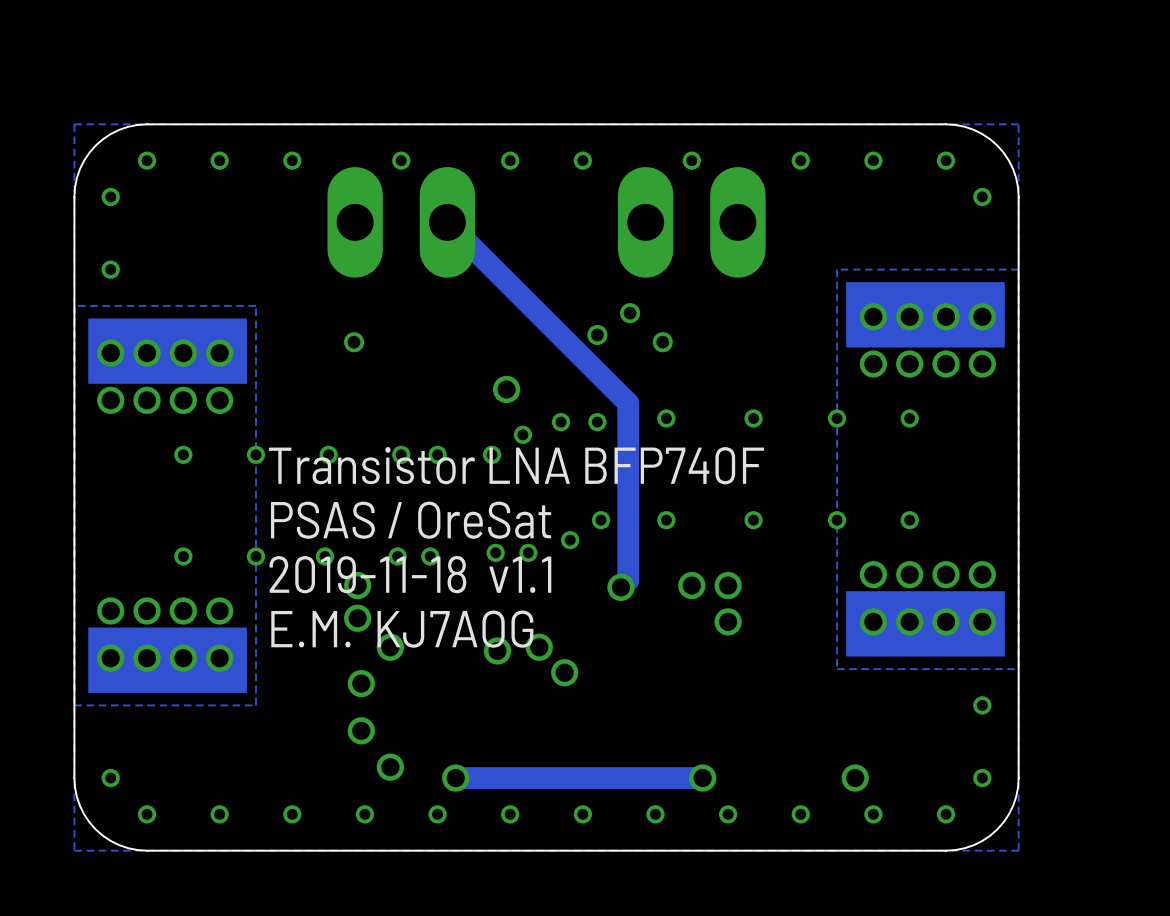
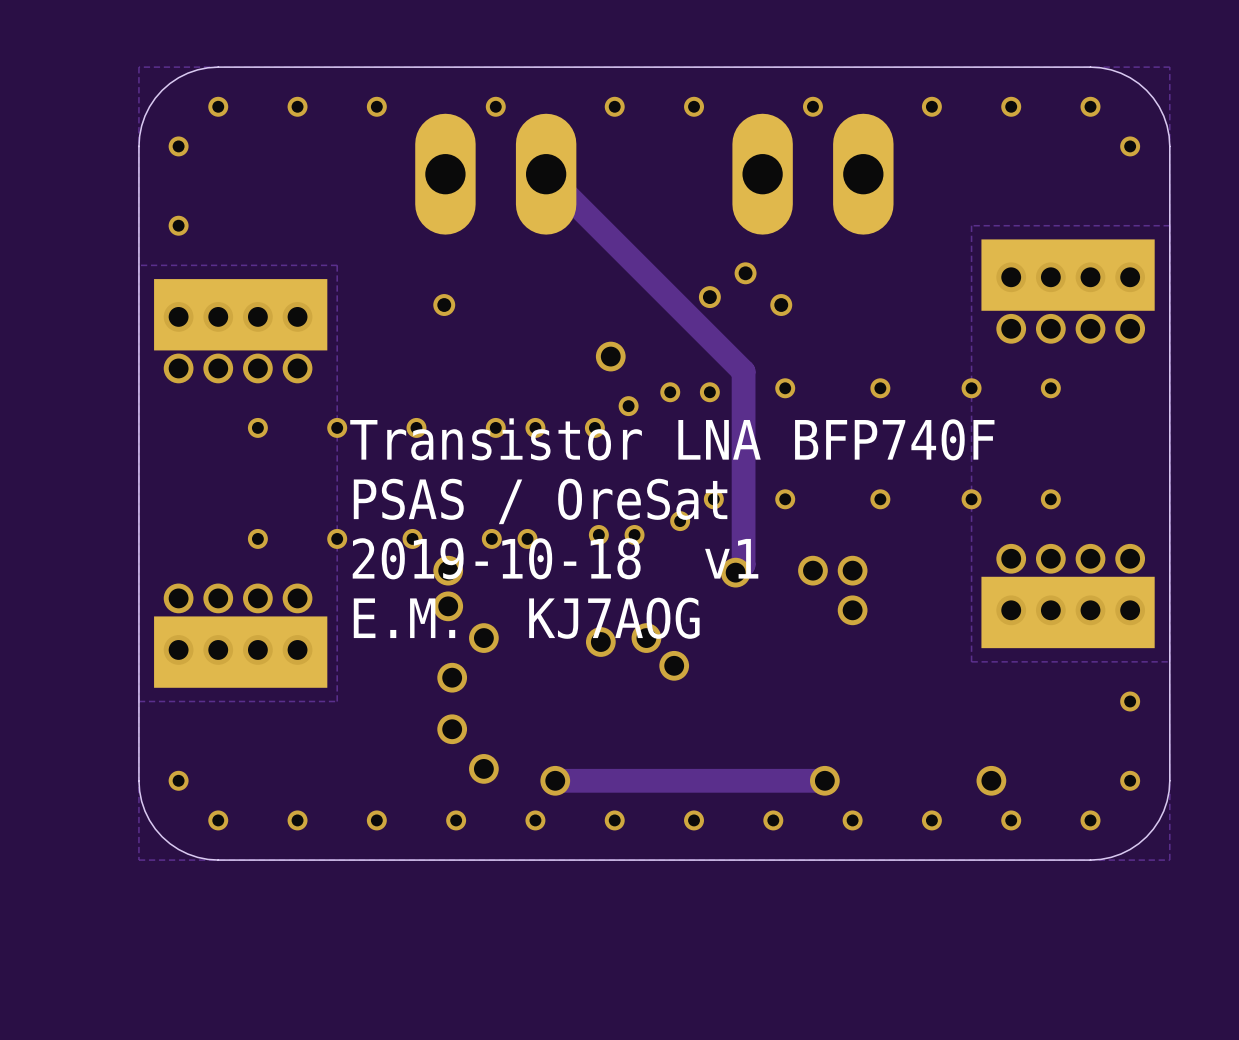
text: 2019-11-18 v1.1 (410, 574) -> 2019-10-18 v1 (555, 558)

